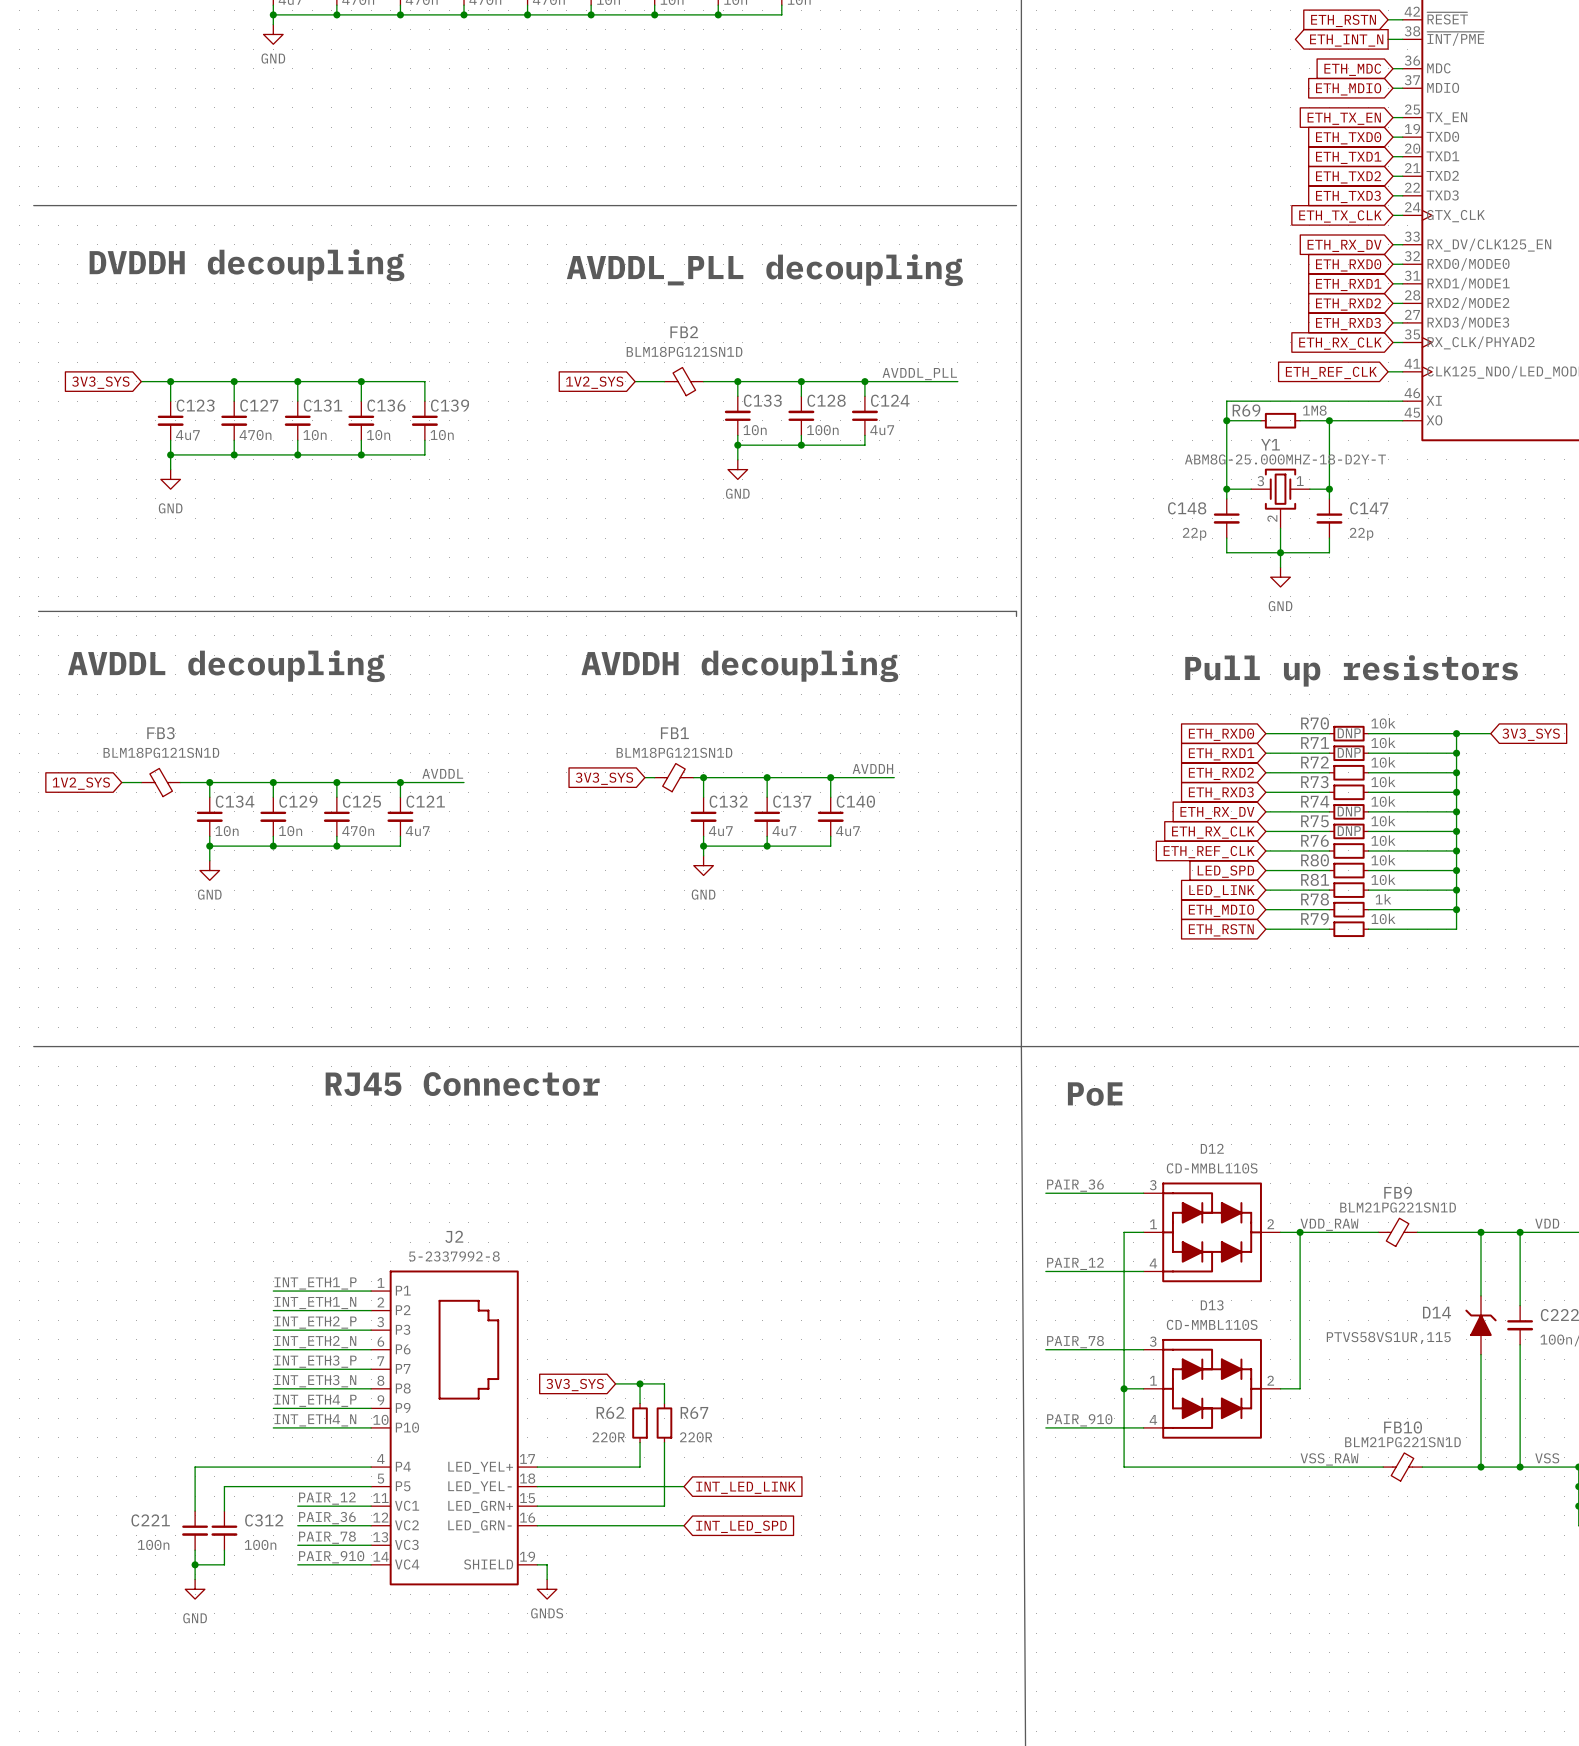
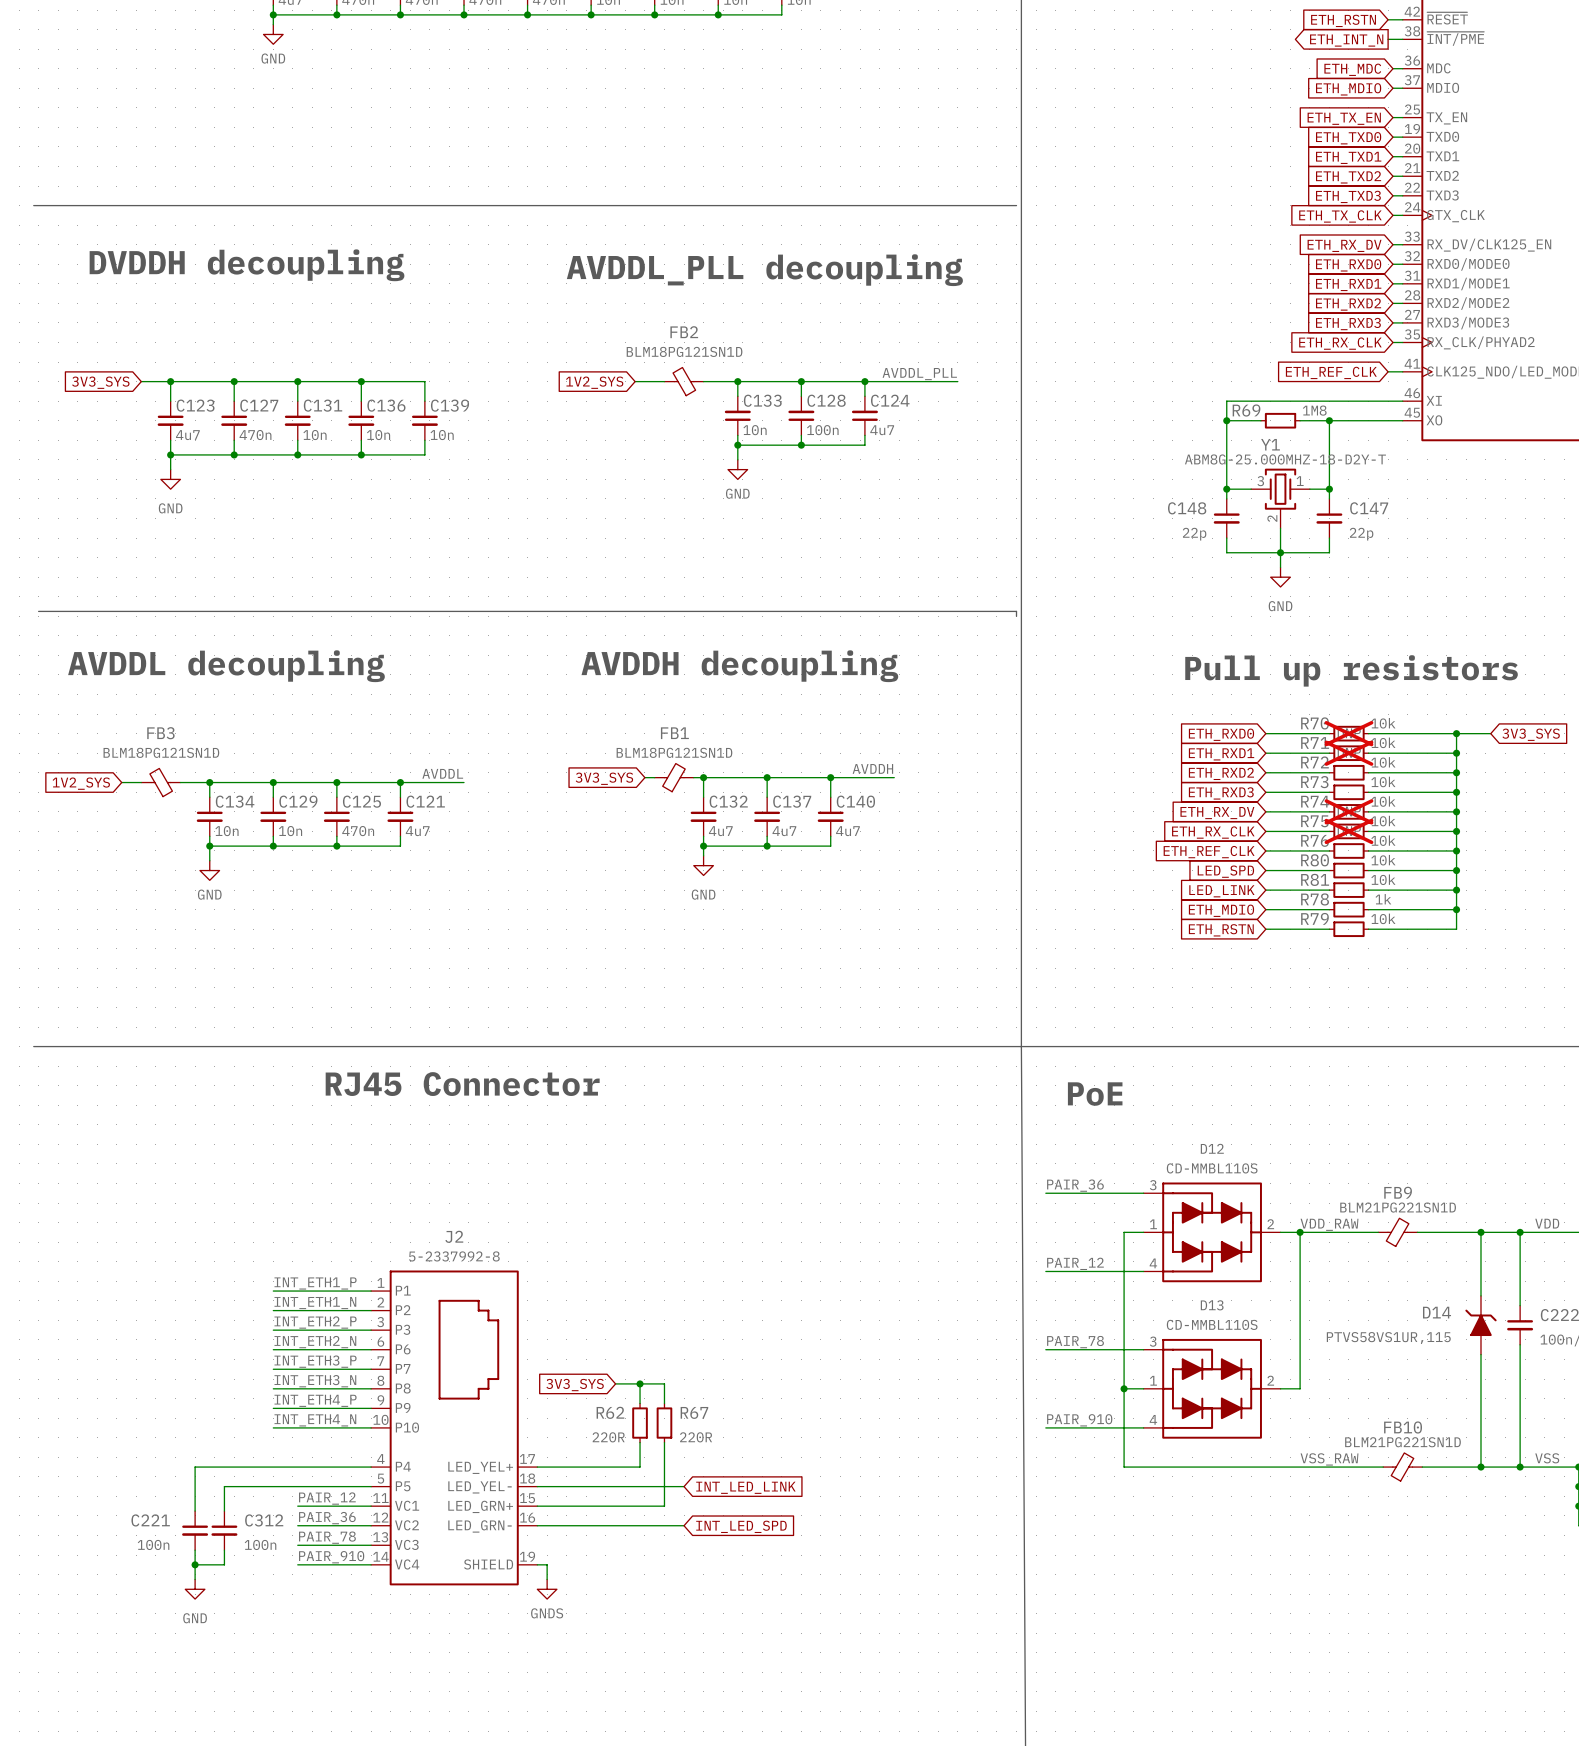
R70 do-not-place cross: none -> (1348, 733)
R71 do-not-place cross: none -> (1348, 753)
R74 do-not-place cross: none -> (1348, 811)
R75 do-not-place cross: none -> (1348, 831)

